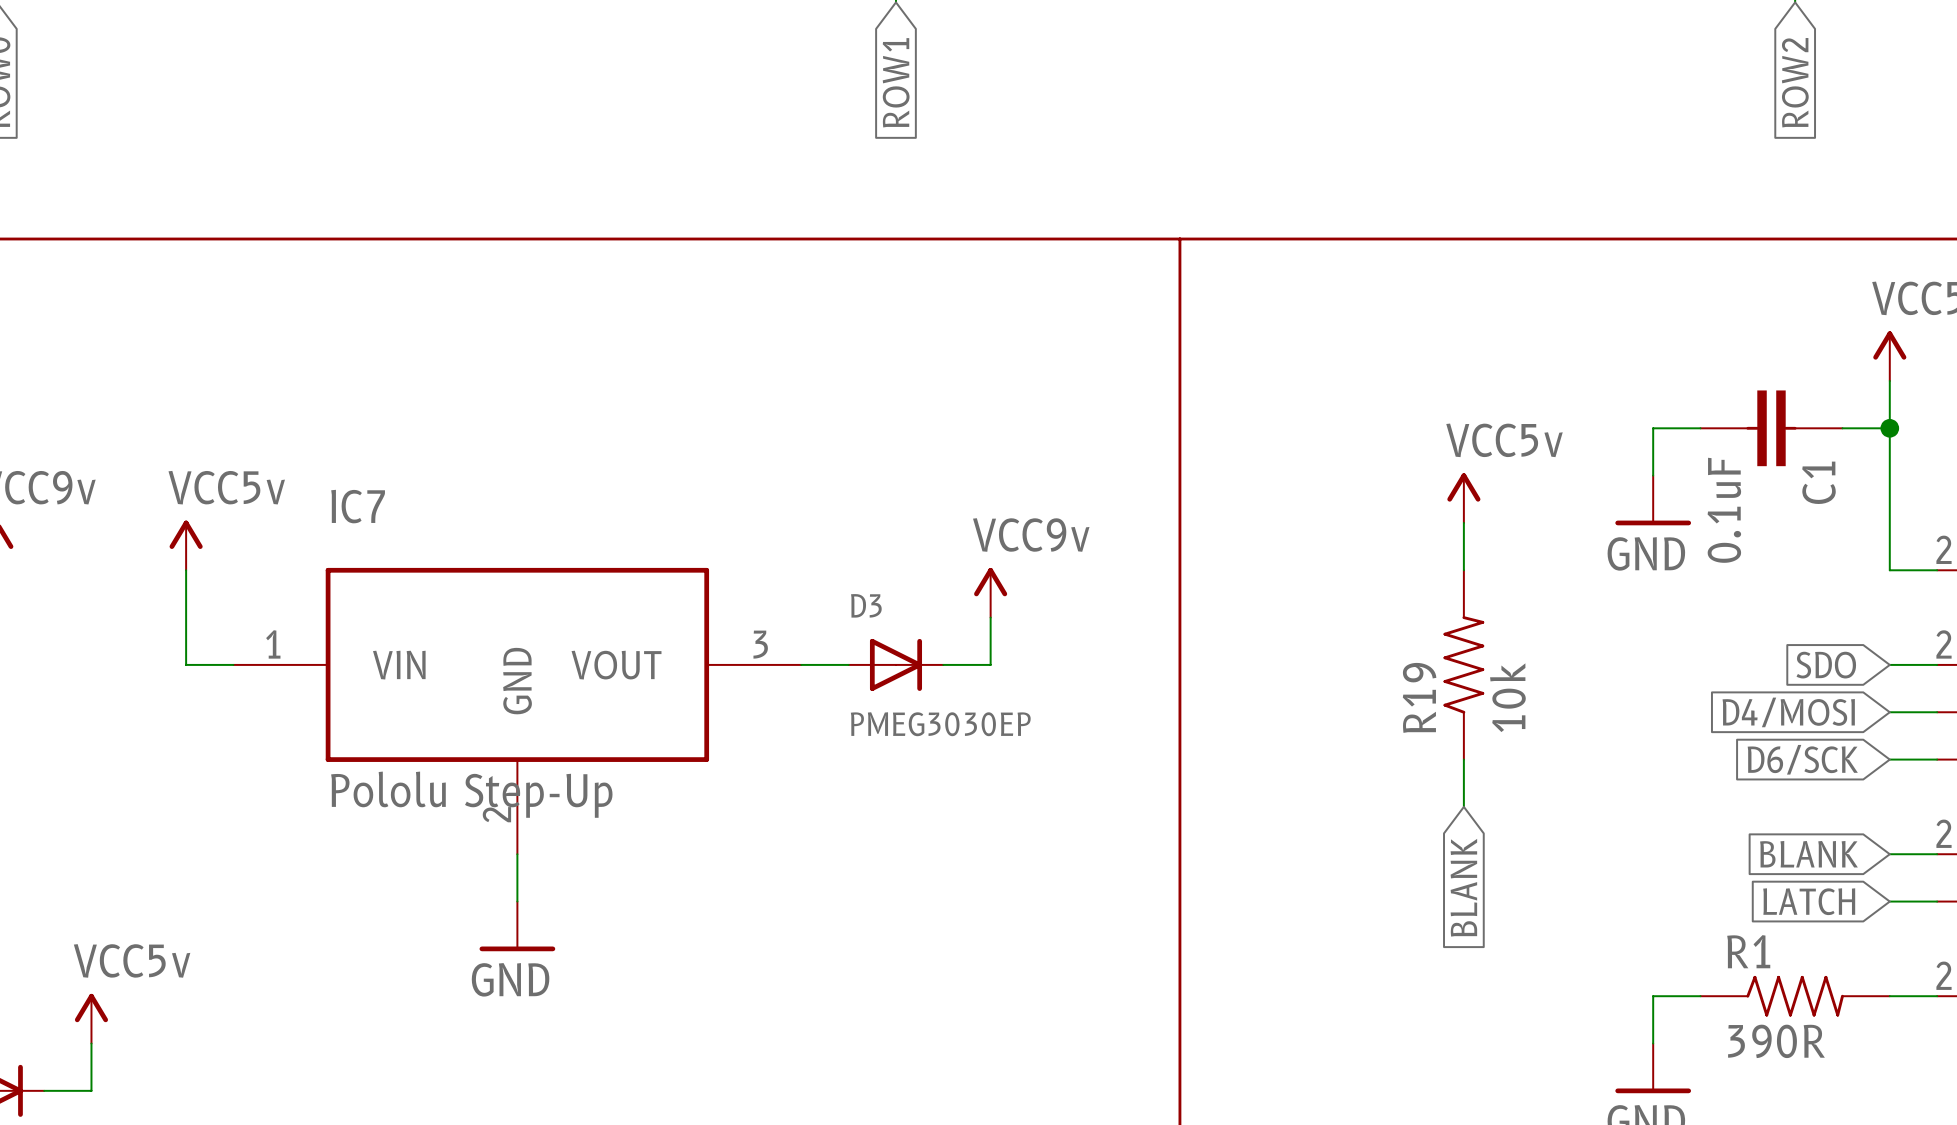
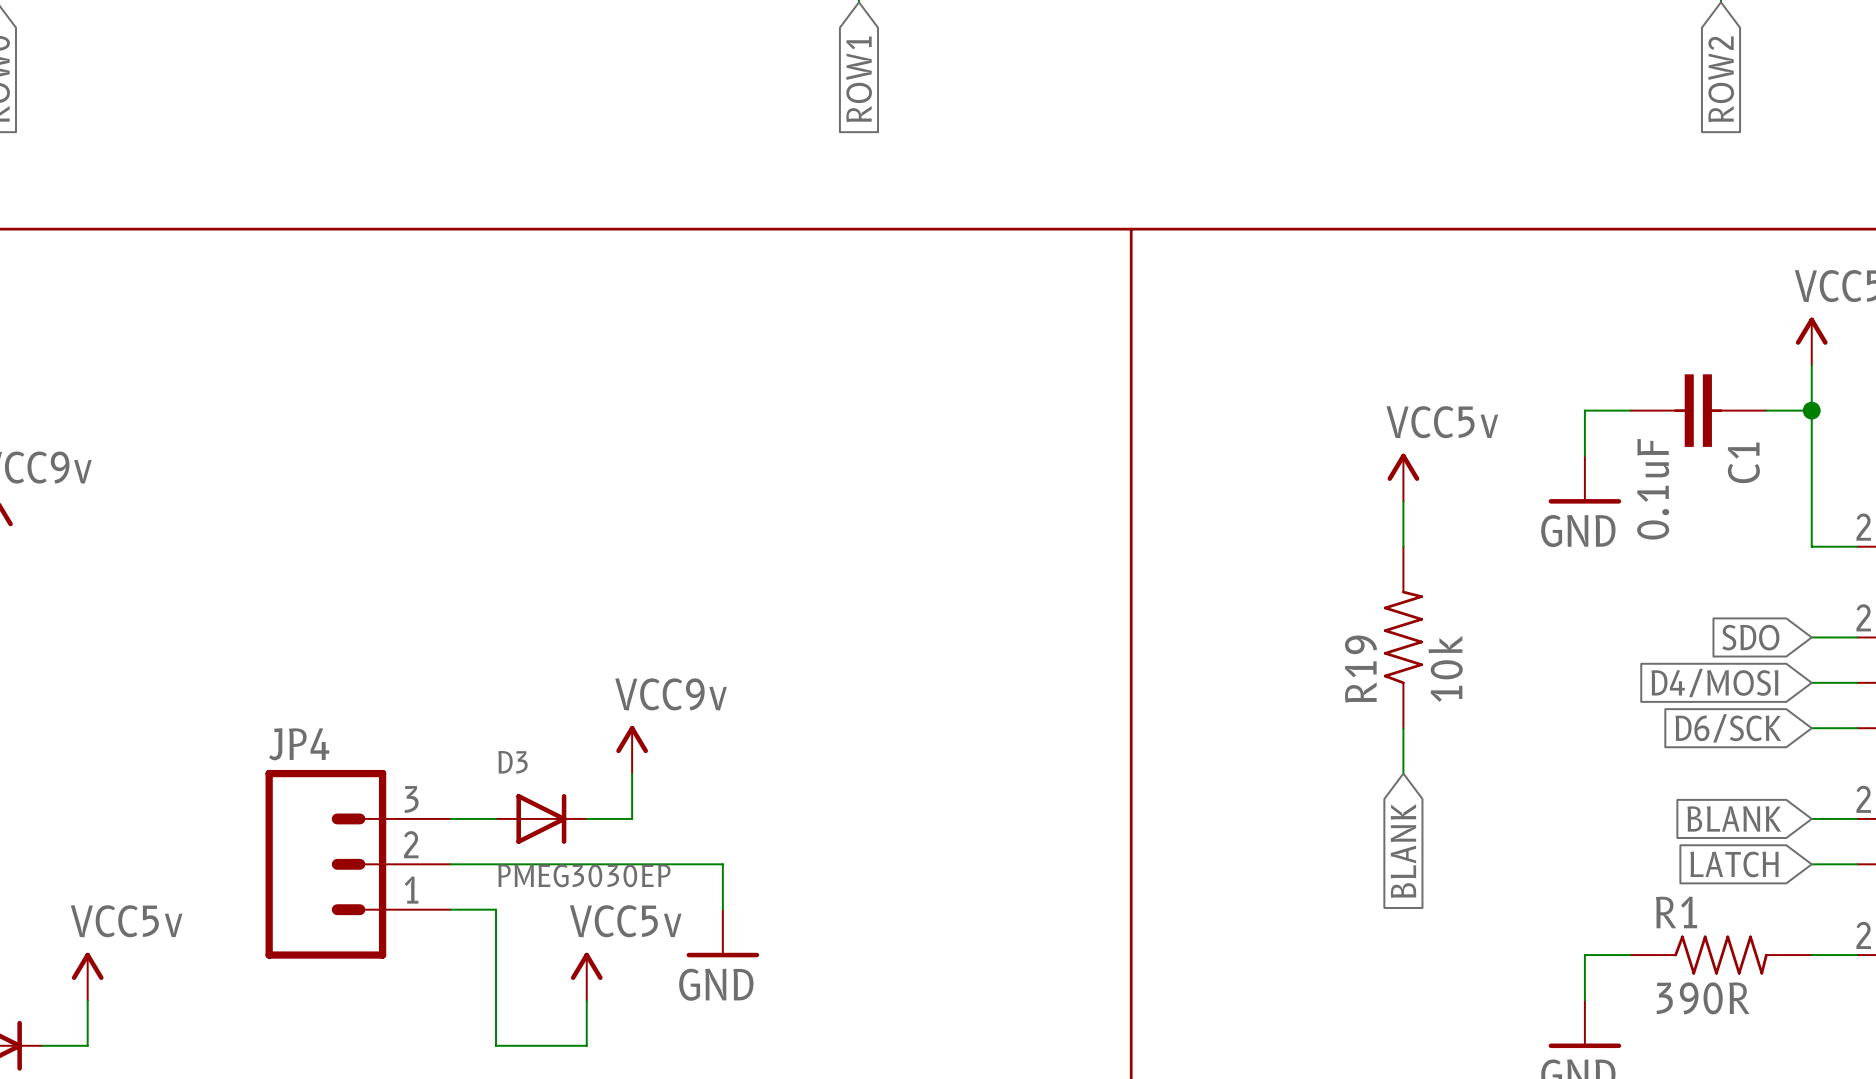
power symbol: VCC5v (186, 545) -> none
wire: (186, 570) (186, 664) (233, 664) -> none
power symbol position: VCC9v (990, 592) -> VCC9v (632, 749)
wire: (990, 617) (990, 664) (943, 664) -> (632, 773) (632, 818) (586, 818)
wire: (801, 664) (848, 664) -> none
D3 position: (895, 664) -> (541, 818)
IC7: Pololu Step-Up (517, 711) -> none
wire: (517, 854) (517, 901) -> (496, 818) (450, 818)
JP4: none -> (358, 864)
wire: none -> (450, 864) (722, 864) (722, 909)
power symbol position: GND (517, 926) -> GND (722, 933)
wire: none -> (450, 909) (496, 909) (496, 1045) (586, 1045) (586, 1000)
power symbol: none -> VCC5v (586, 976)

